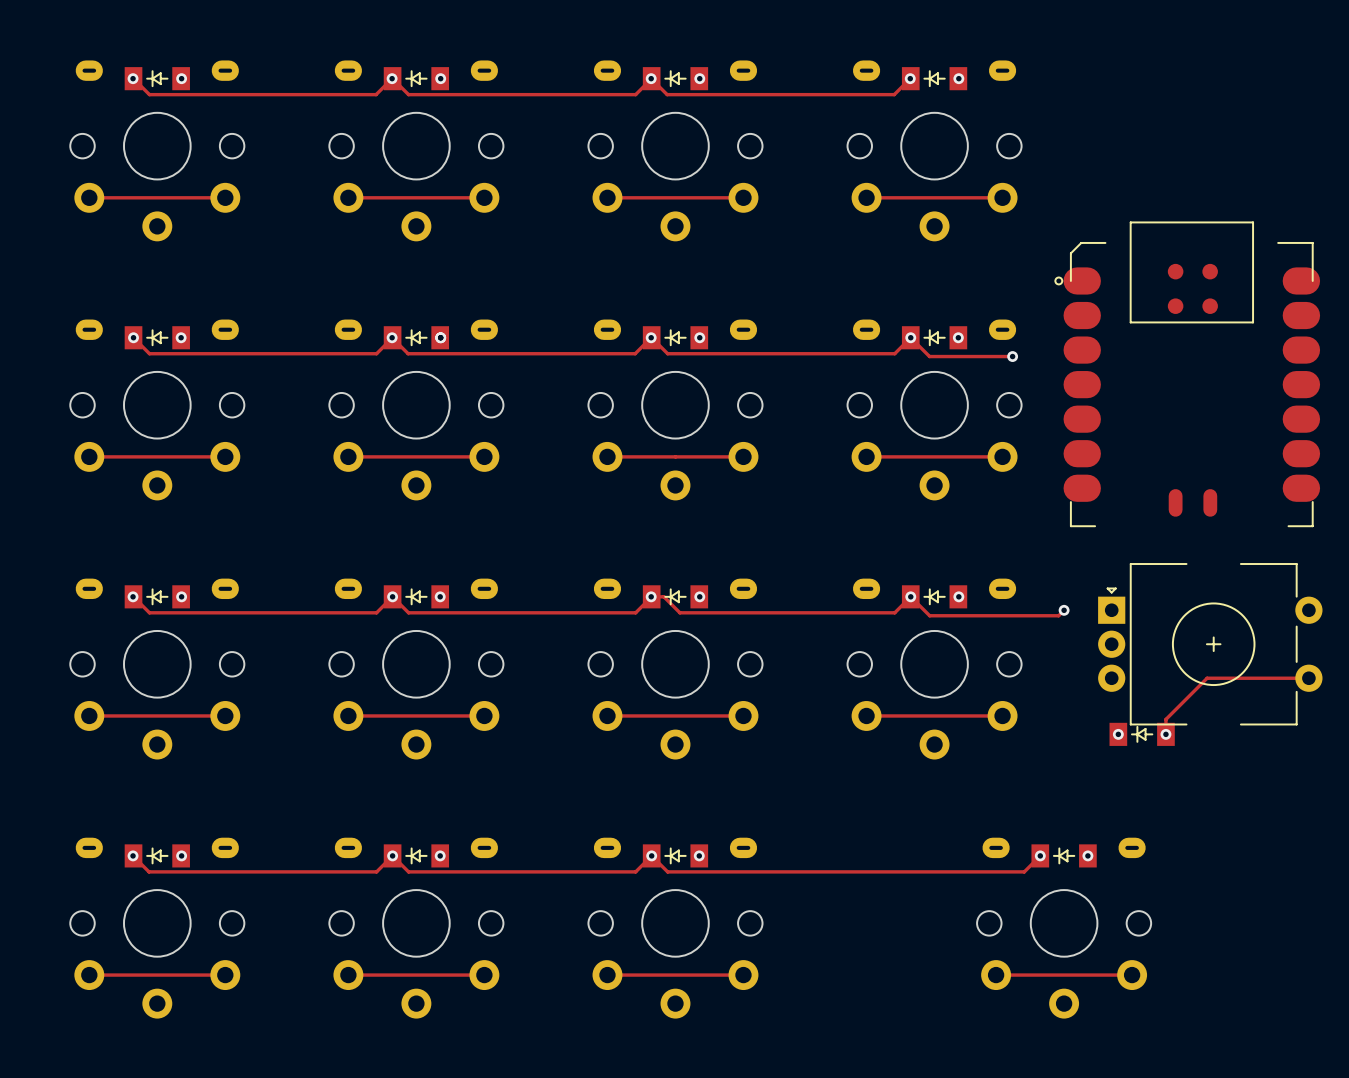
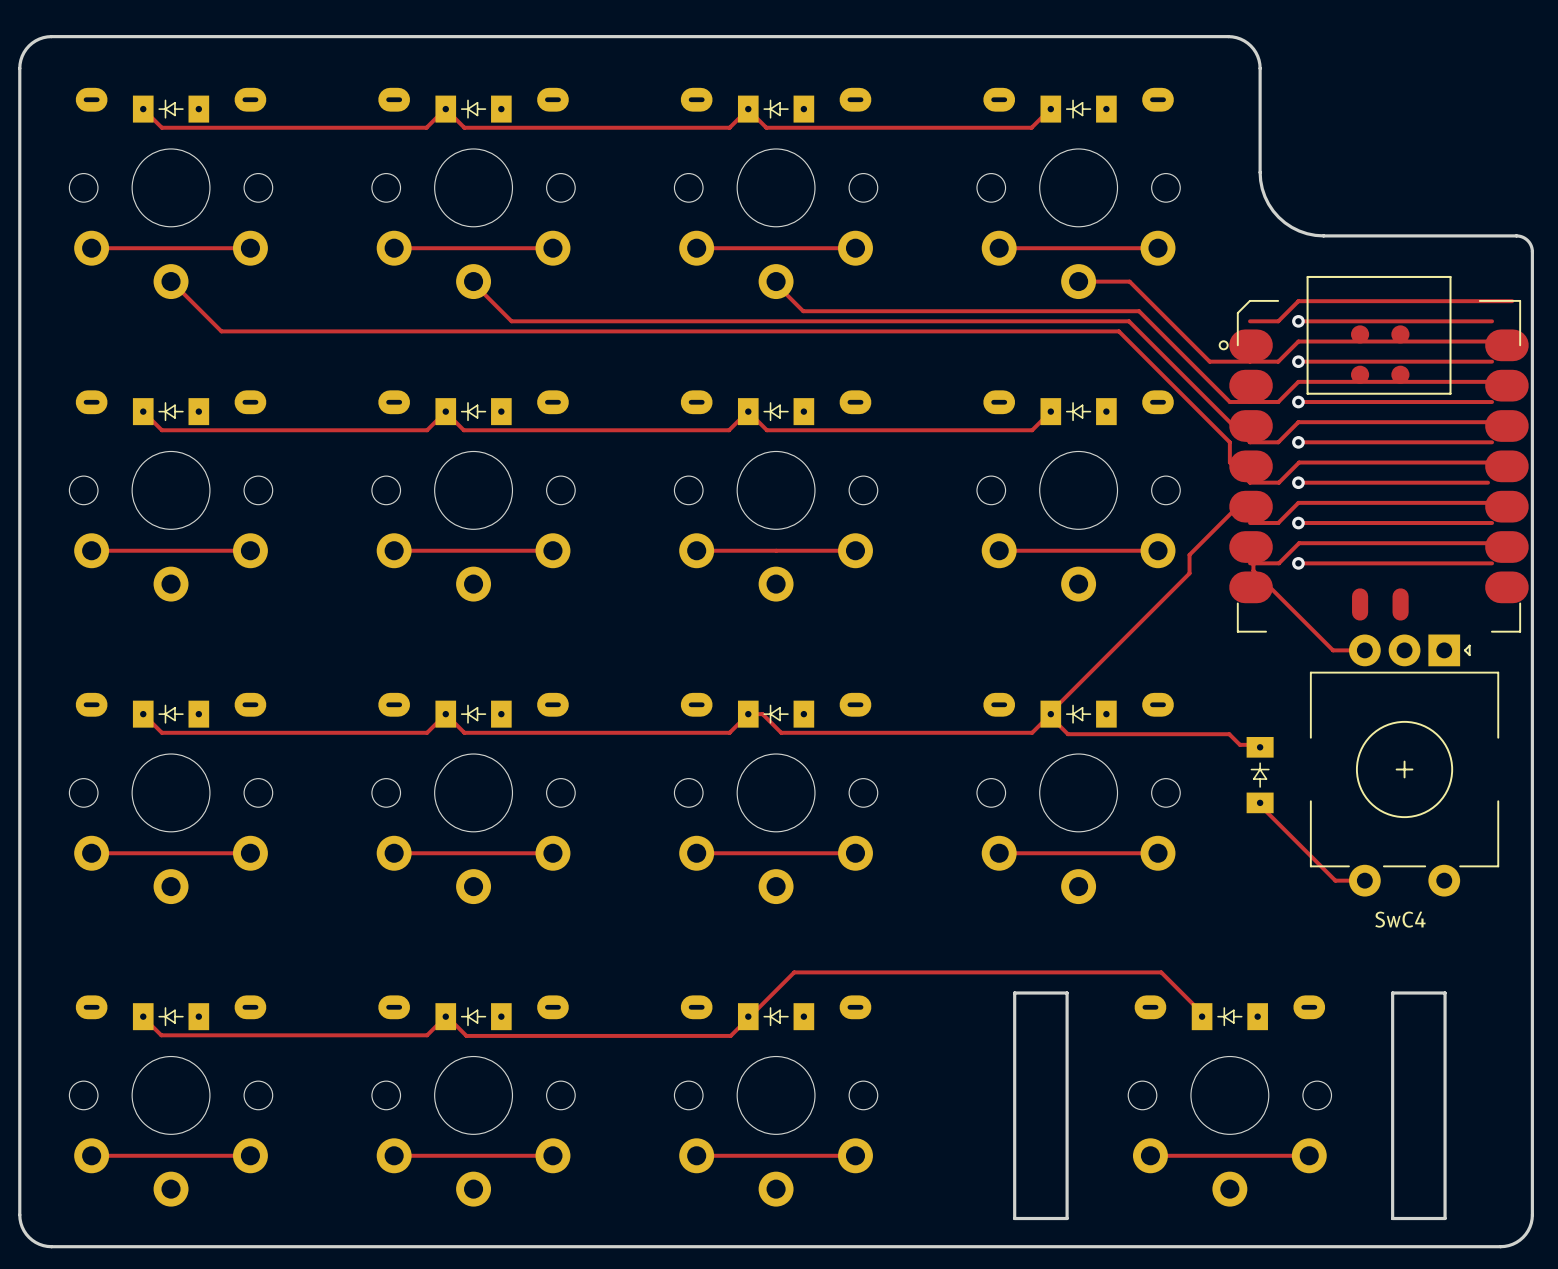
drawing: none -> [18, 35, 1534, 1249]
part footprint: [124, 67, 190, 91] -> [132, 95, 210, 123]
part footprint: [383, 67, 450, 91] -> [435, 95, 512, 123]
part footprint: [642, 67, 709, 91] -> [737, 95, 815, 123]
part footprint: [901, 67, 968, 91] -> [1040, 95, 1117, 123]
via: (133, 78) -> none
via: (181, 78) -> none
via: (392, 78) -> none
via: (440, 78) -> none
via: (651, 78) -> none
via: (699, 78) -> none
via: (910, 78) -> none
via: (958, 78) -> none
track: none -> (171, 280) (221, 331) (1118, 331) (1229, 442) (1229, 462) (1250, 482) (1278, 482) (1299, 462) (1512, 462)
track: none -> (471, 281) (511, 321) (1129, 321) (1250, 442) (1278, 442) (1298, 422) (1512, 422)
track: none -> (773, 281) (803, 311) (1139, 311) (1229, 401) (1278, 401) (1298, 381) (1512, 381)
track: none -> (1078, 284) (1082, 281) (1129, 281) (1209, 361) (1278, 361) (1298, 341) (1512, 341)
track: none -> (1512, 301) (1298, 301) (1278, 321) (1250, 321)
track: none -> (1298, 321) (1492, 321)
via: none -> (1298, 321)
track: none -> (1298, 361) (1492, 361)
via: none -> (1298, 361)
part footprint: [124, 326, 190, 350] -> [132, 398, 210, 426]
part footprint: [383, 326, 450, 350] -> [435, 398, 512, 426]
part footprint: [642, 326, 709, 350] -> [737, 398, 815, 426]
part footprint: [901, 326, 968, 350] -> [1040, 398, 1117, 426]
track: none -> (1298, 402) (1492, 402)
via: none -> (1298, 402)
via: (133, 337) -> none
via: (181, 337) -> none
via: (392, 337) -> none
via: (440, 337) -> none
via: (651, 337) -> none
via: (699, 337) -> none
track: (910, 337) (929, 356) (1012, 356) -> none
via: (910, 337) -> none
via: (958, 337) -> none
via: (1012, 356) -> none
track: none -> (1298, 442) (1492, 442)
via: none -> (1298, 442)
track: none -> (1298, 482) (1488, 482)
via: none -> (1298, 482)
track: none -> (1270, 502) (1241, 502) (1189, 554) (1189, 573) (1048, 714)
track: none -> (1512, 502) (1298, 502) (1278, 523) (1250, 523)
track: none -> (1298, 523) (1492, 523)
via: none -> (1298, 523)
track: none -> (1512, 543) (1299, 543) (1278, 563) (1250, 563)
track: none -> (1253, 562) (1253, 570) (1333, 650) (1364, 650)
track: none -> (1298, 563) (1492, 563)
via: none -> (1298, 563)
part footprint: [124, 585, 190, 609] -> [132, 700, 210, 728]
part footprint: [383, 585, 450, 609] -> [435, 700, 512, 728]
part footprint: [642, 585, 709, 609] -> [737, 700, 815, 728]
part footprint: [901, 585, 968, 609] -> [1040, 700, 1117, 728]
via: (133, 596) -> none
via: (181, 596) -> none
via: (392, 596) -> none
via: (440, 596) -> none
via: (651, 596) -> none
via: (699, 596) -> none
track: (910, 596) (929, 615) (1058, 615) (1064, 610) -> (1050, 714) (1050, 717) (1067, 734) (1229, 734) (1239, 744) (1260, 744)
via: (910, 596) -> none
via: (958, 596) -> none
via: (1064, 610) -> none
part rotation: 0° (1210, 644) -> 90° clockwise (1404, 765)
part: none -> (1260, 775)
track: none -> (1260, 805) (1335, 880) (1364, 880)
track: (1308, 678) (1207, 678) (1165, 719) (1165, 734) -> none
via: (1118, 734) -> none
part: (1142, 734) -> none
via: (1165, 734) -> none
text: none -> SwC4 (1400, 919)
part footprint: [124, 844, 190, 868] -> [132, 1003, 210, 1031]
part footprint: [383, 844, 450, 868] -> [435, 1003, 512, 1031]
part footprint: [642, 844, 709, 868] -> [737, 1003, 815, 1031]
part footprint: [1031, 844, 1097, 868] -> [1191, 1003, 1268, 1031]
via: (133, 855) -> none
via: (181, 855) -> none
track: (392, 855) (408, 871) (635, 871) (651, 855) (667, 871) (1024, 871) (1040, 855) -> (445, 1016) (466, 1035) (730, 1035) (794, 972) (1161, 972) (1203, 1014)
via: (392, 855) -> none
via: (440, 855) -> none
via: (651, 855) -> none
via: (699, 855) -> none
via: (1040, 855) -> none
via: (1087, 855) -> none

